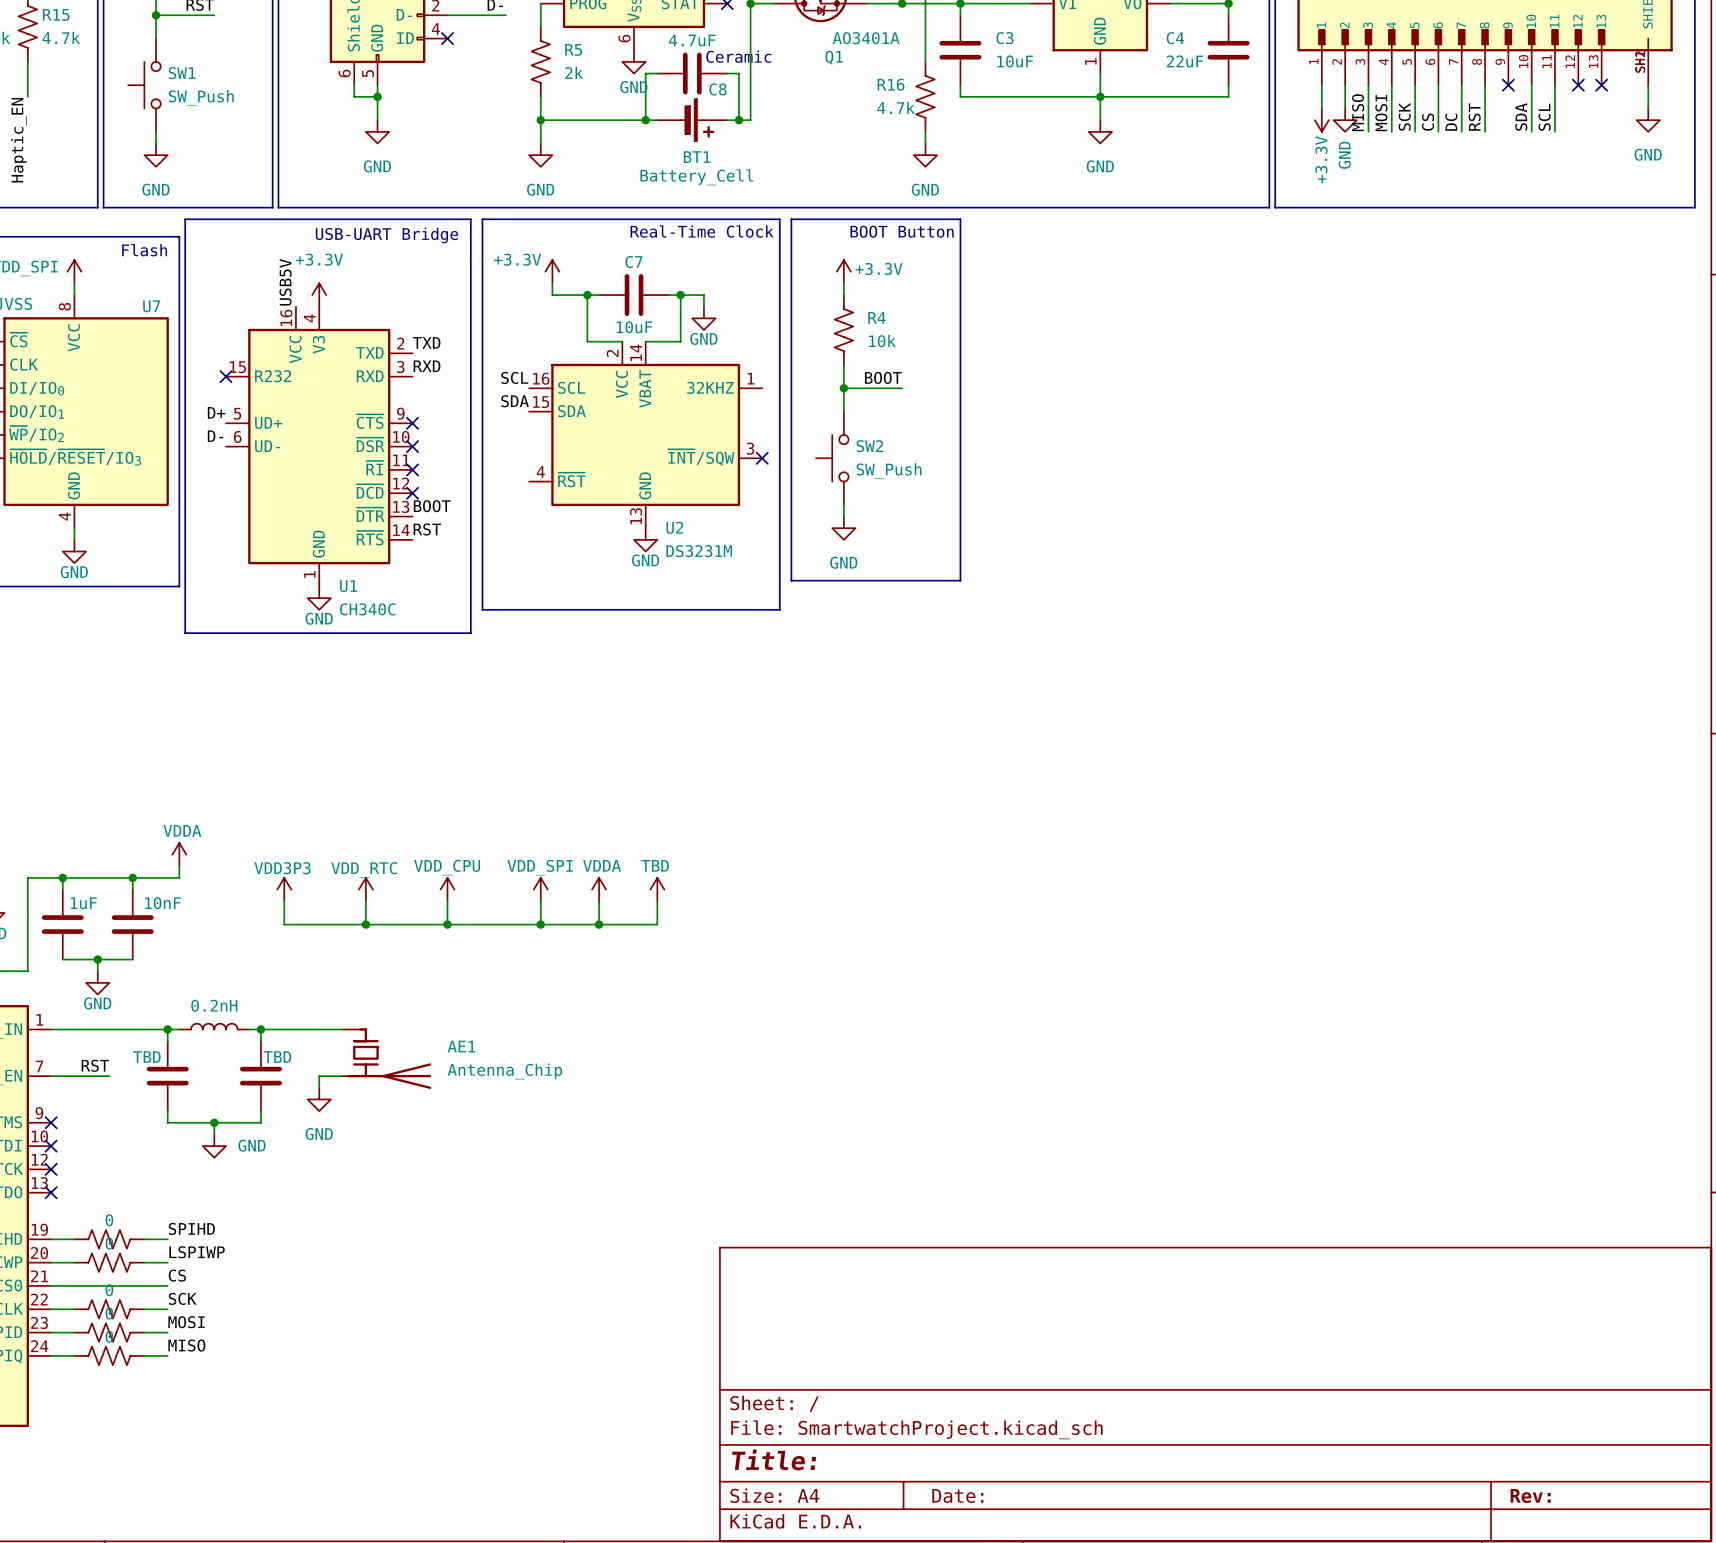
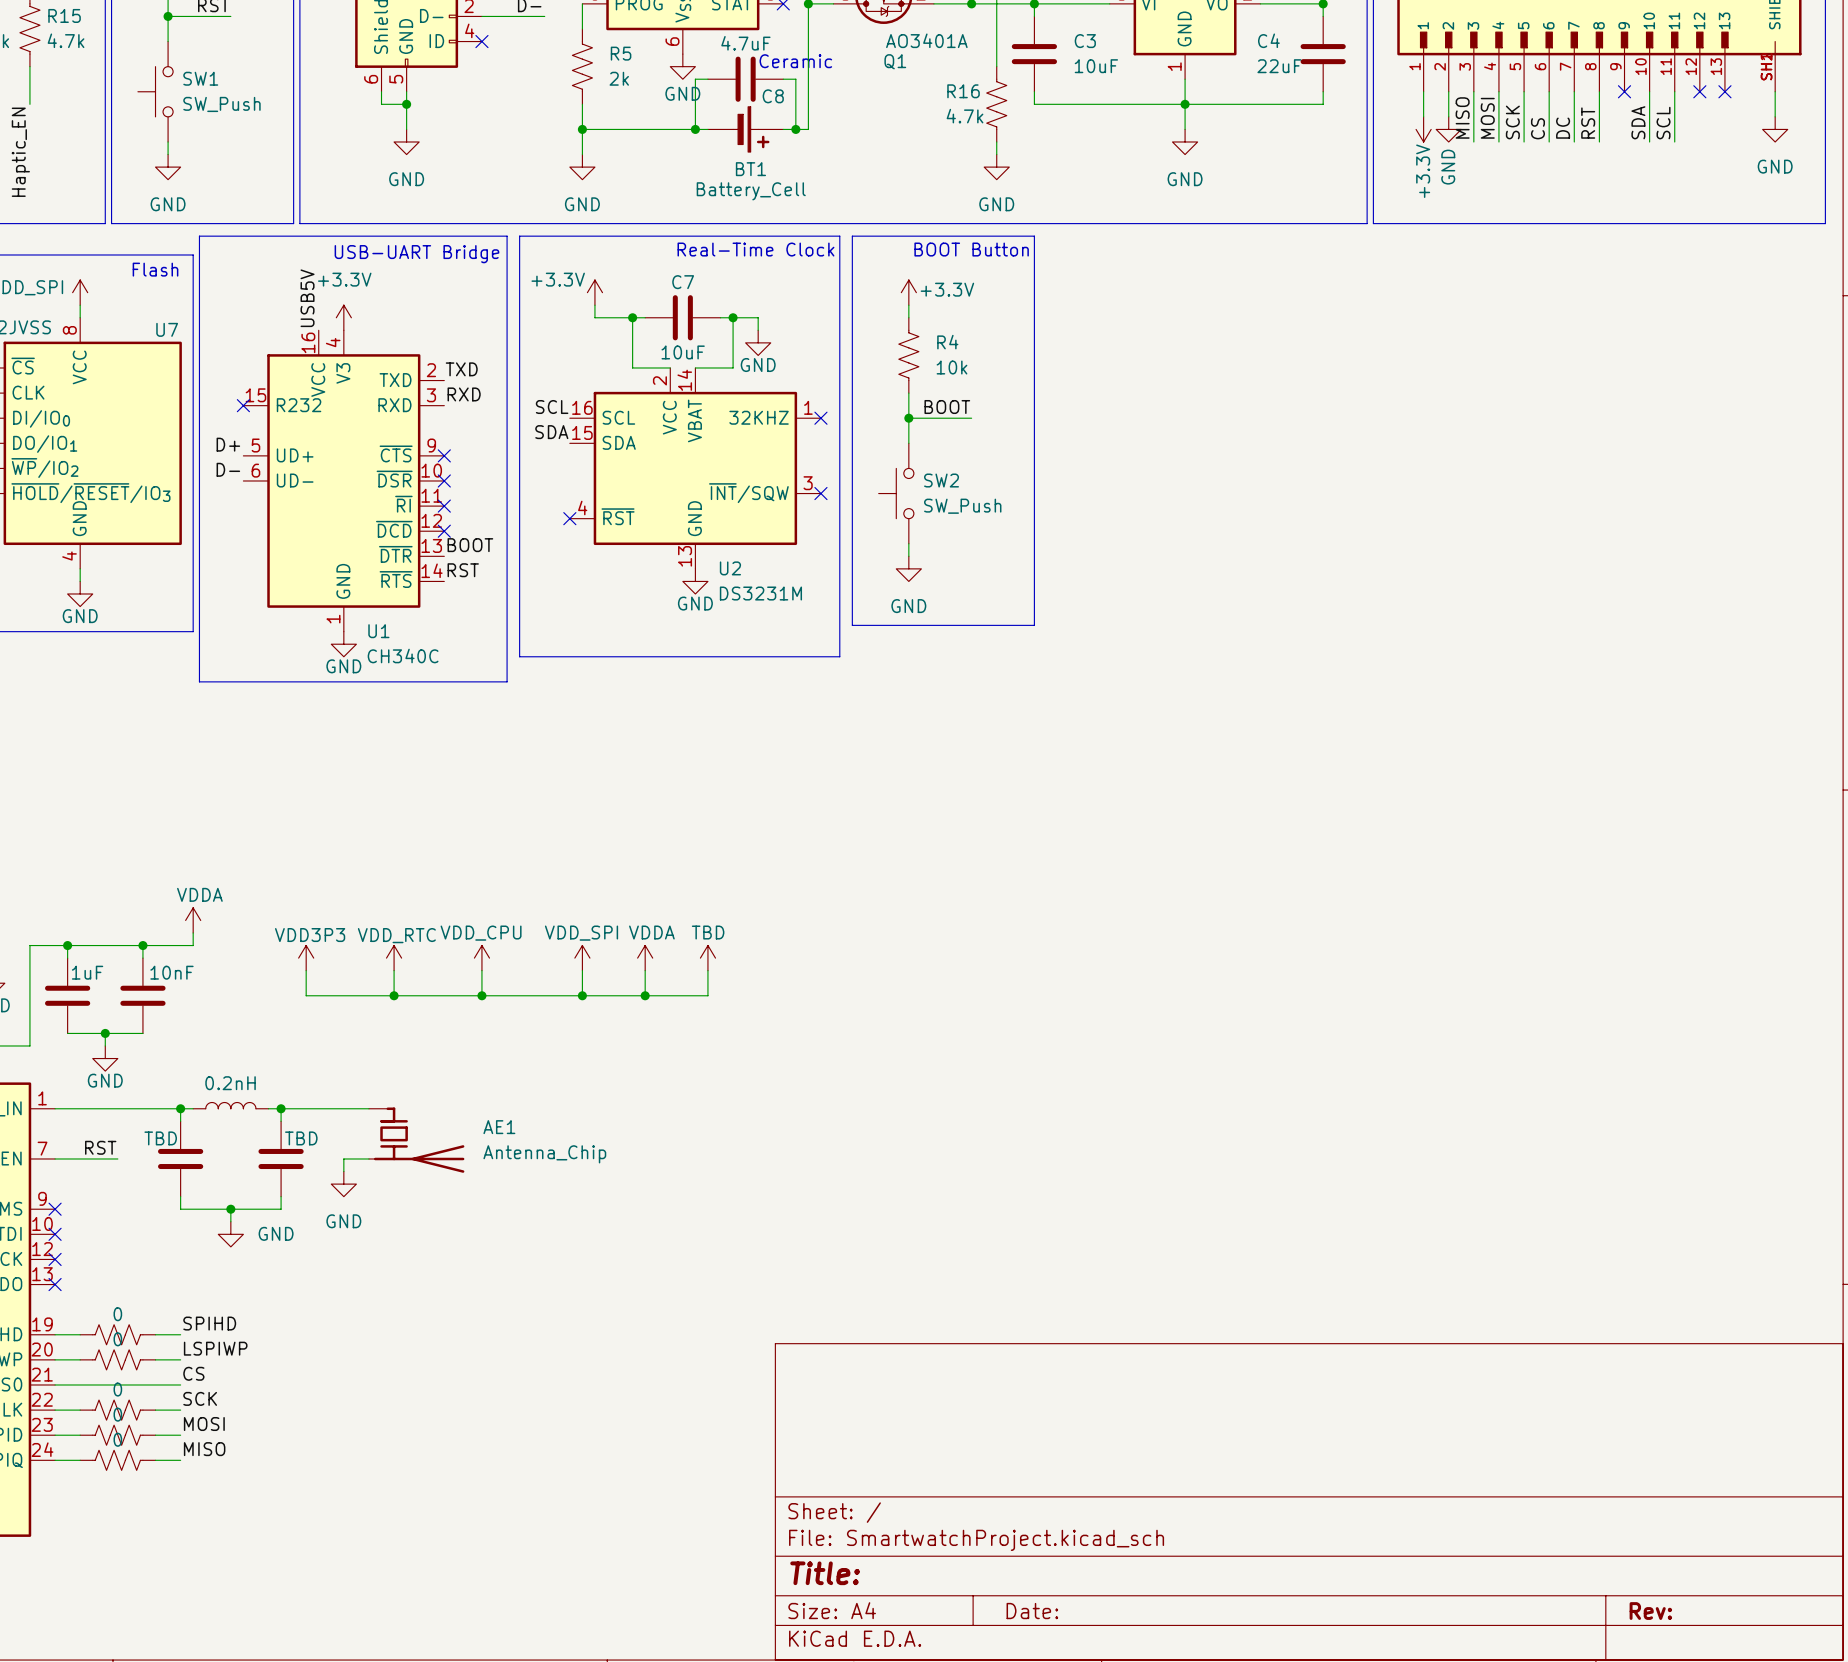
no-connect mark: none -> (820, 418)
no-connect mark: none -> (569, 518)

